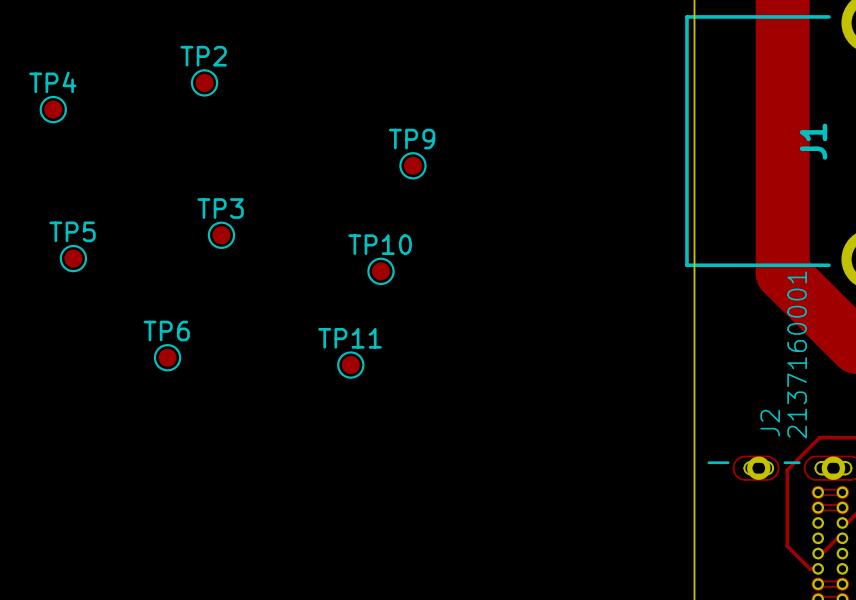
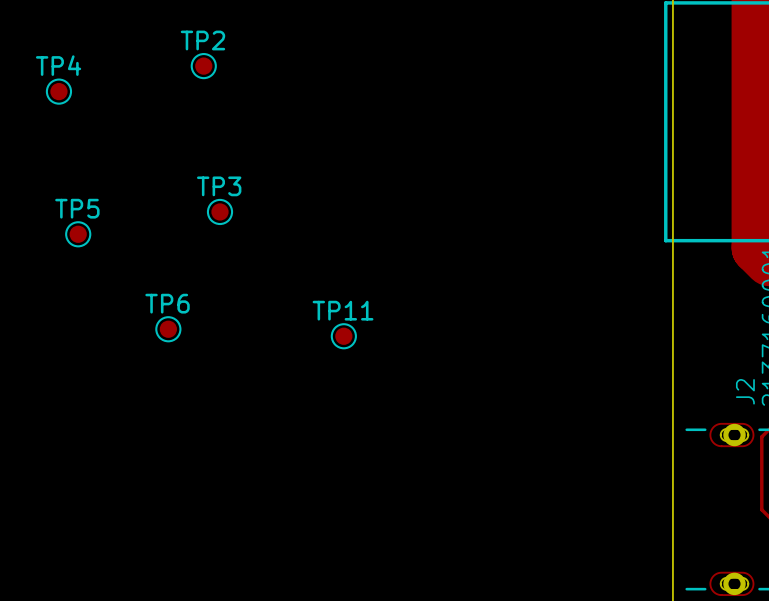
TP9: (412, 165) -> none
TP10: (380, 271) -> none

